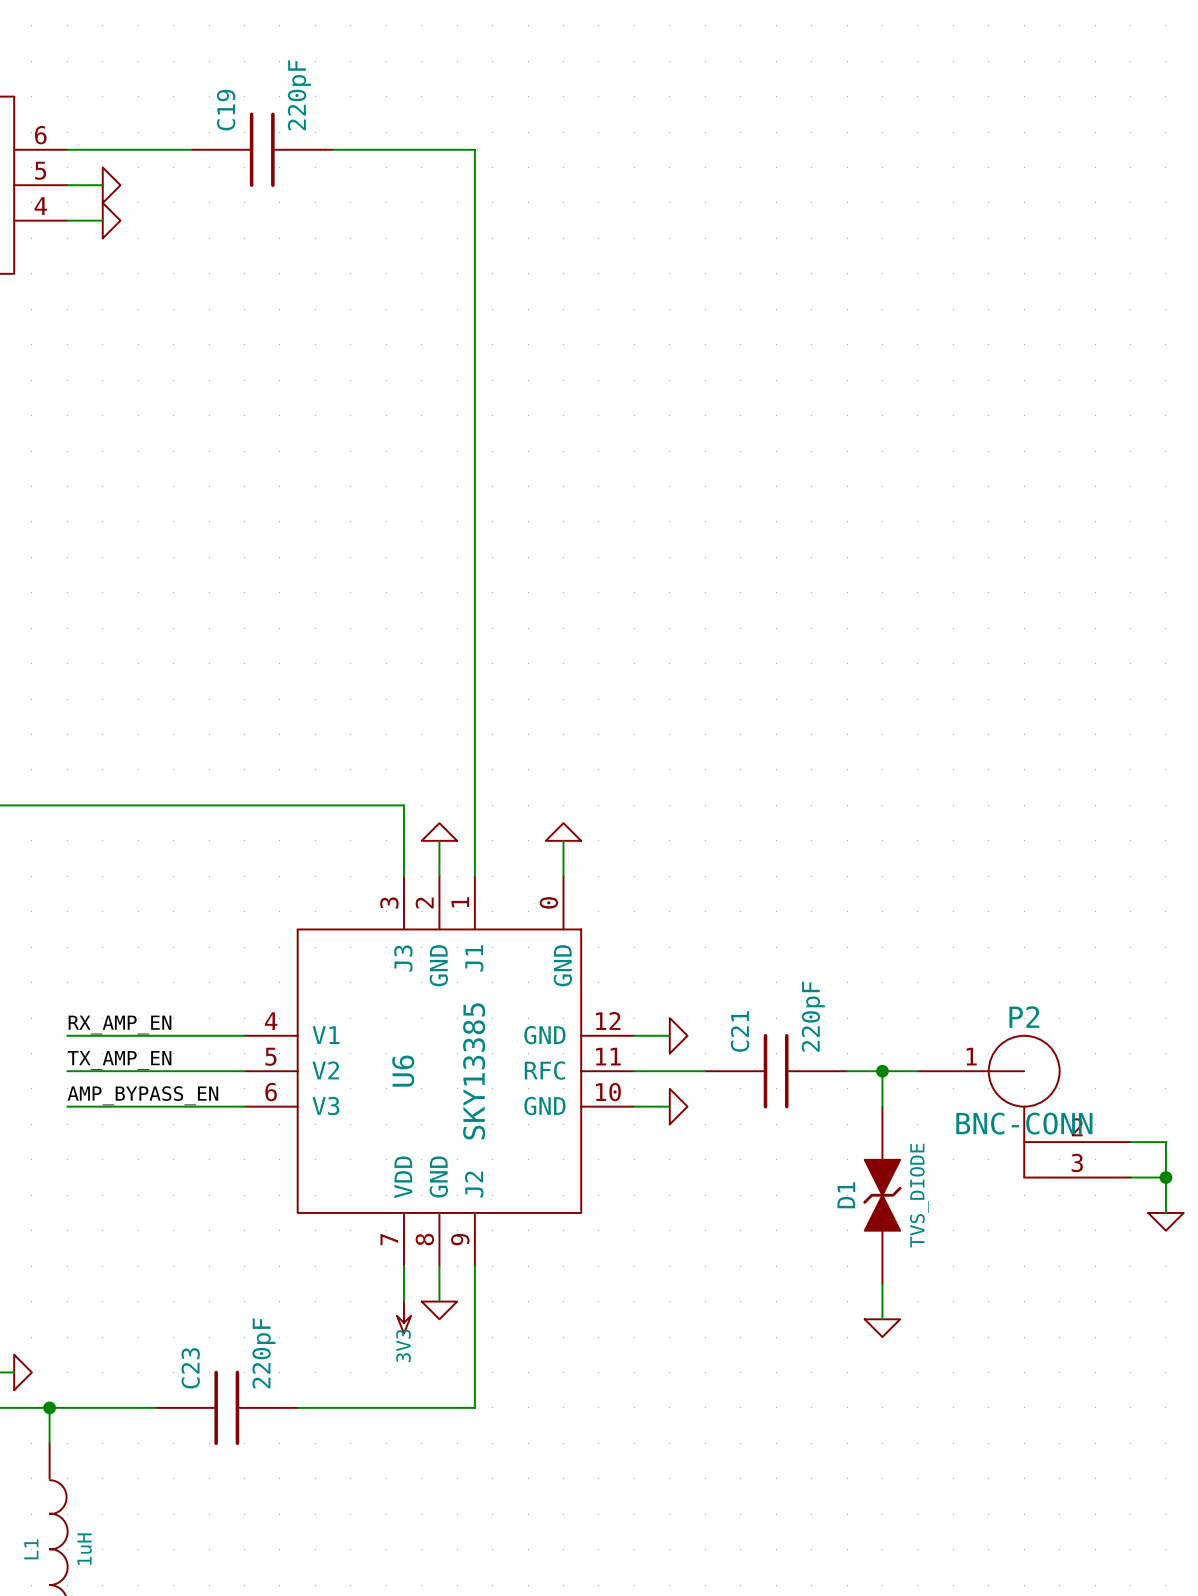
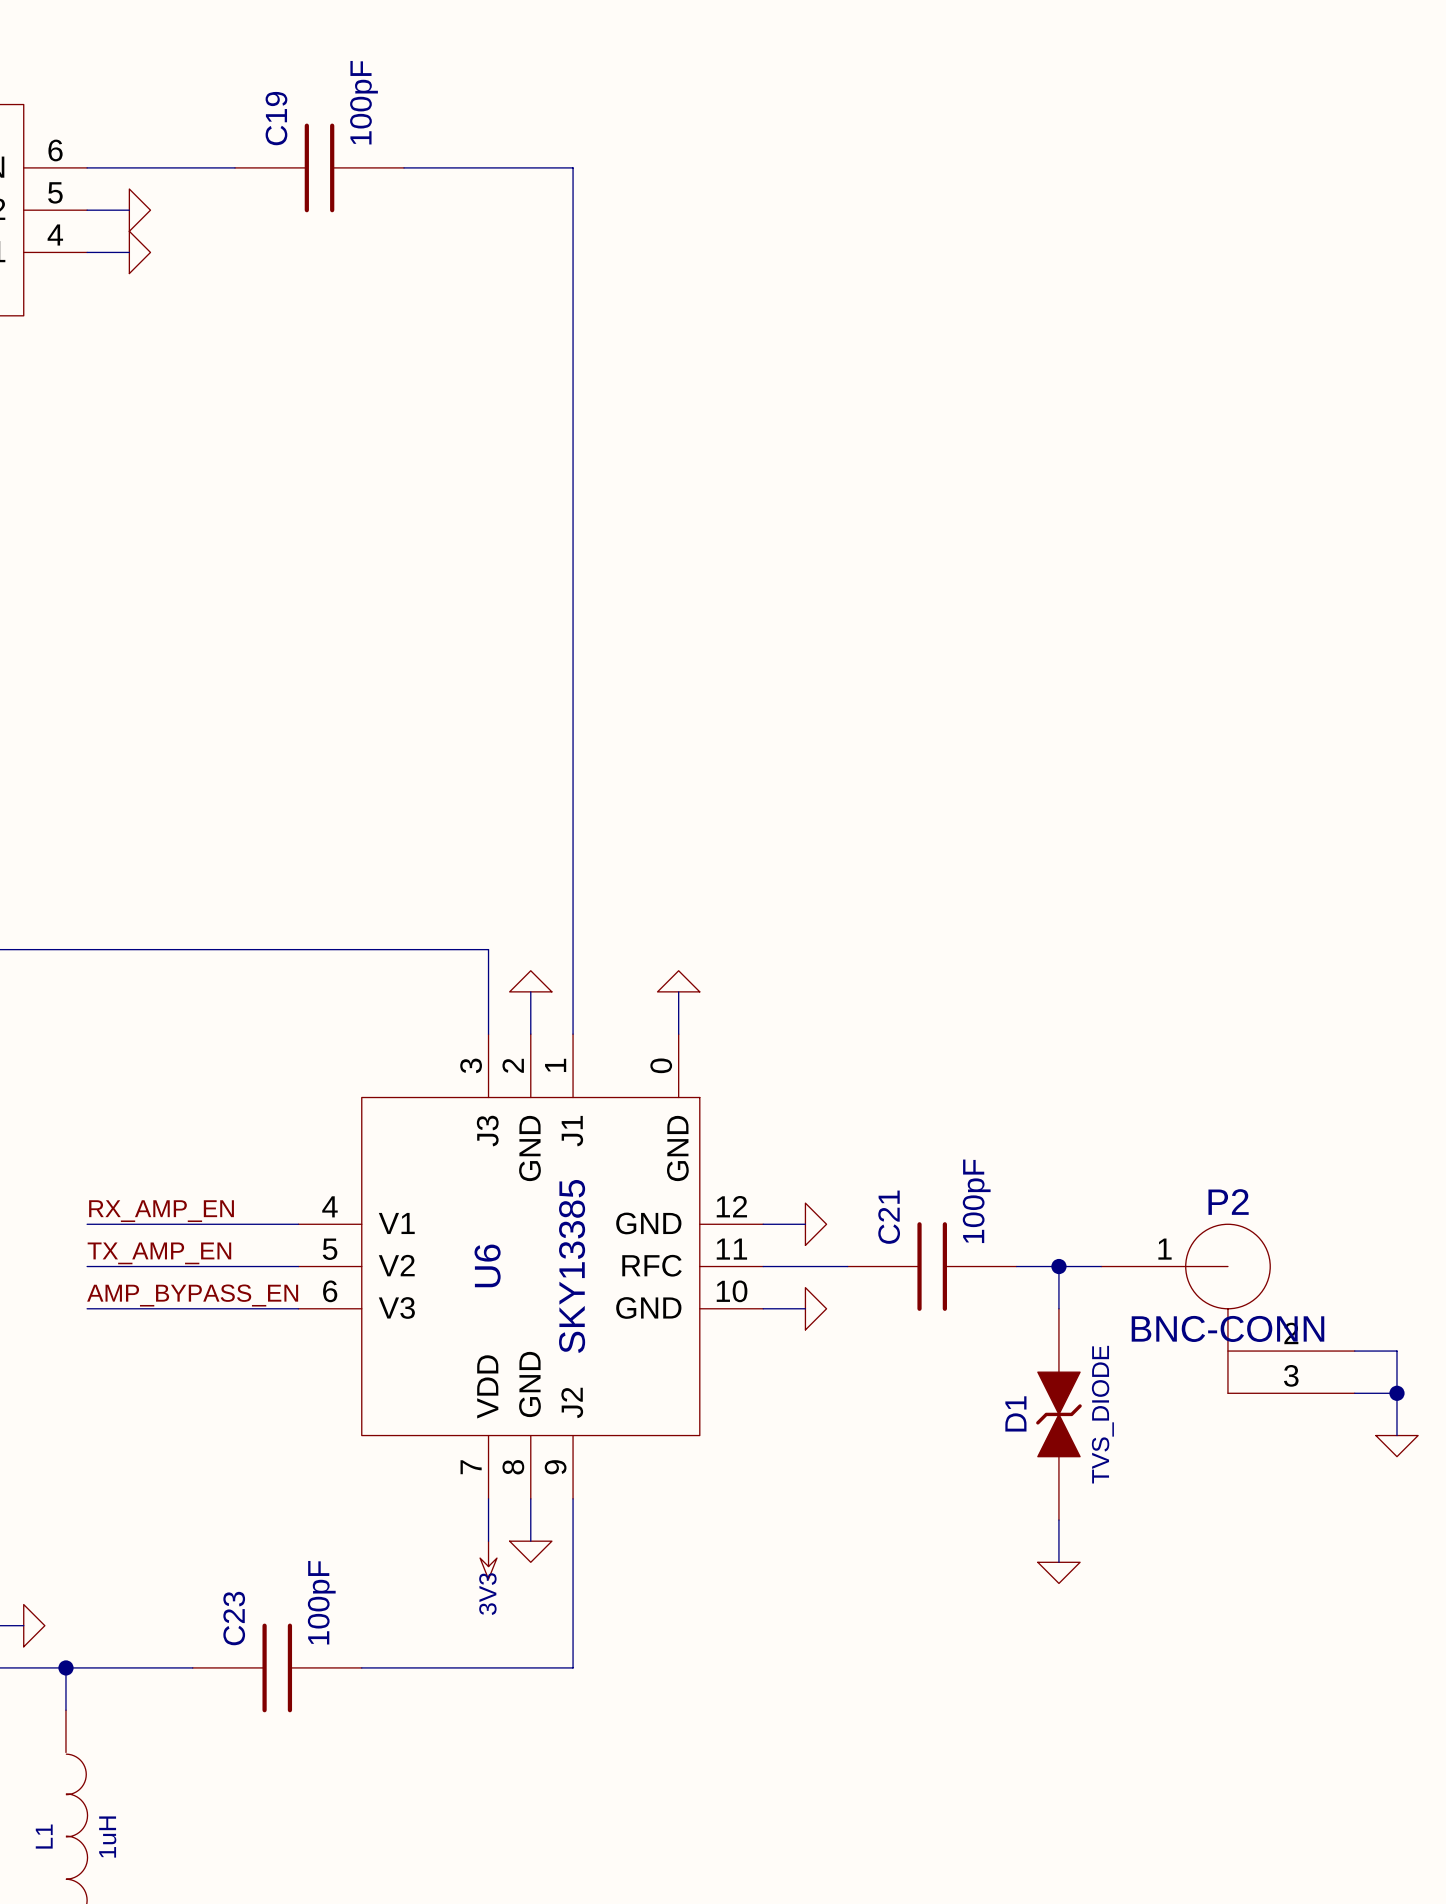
C19 value: 220pF (299, 95) -> 100pF (364, 102)
C21 value: 220pF (813, 1016) -> 100pF (976, 1201)
C23 value: 220pF (263, 1353) -> 100pF (321, 1602)

